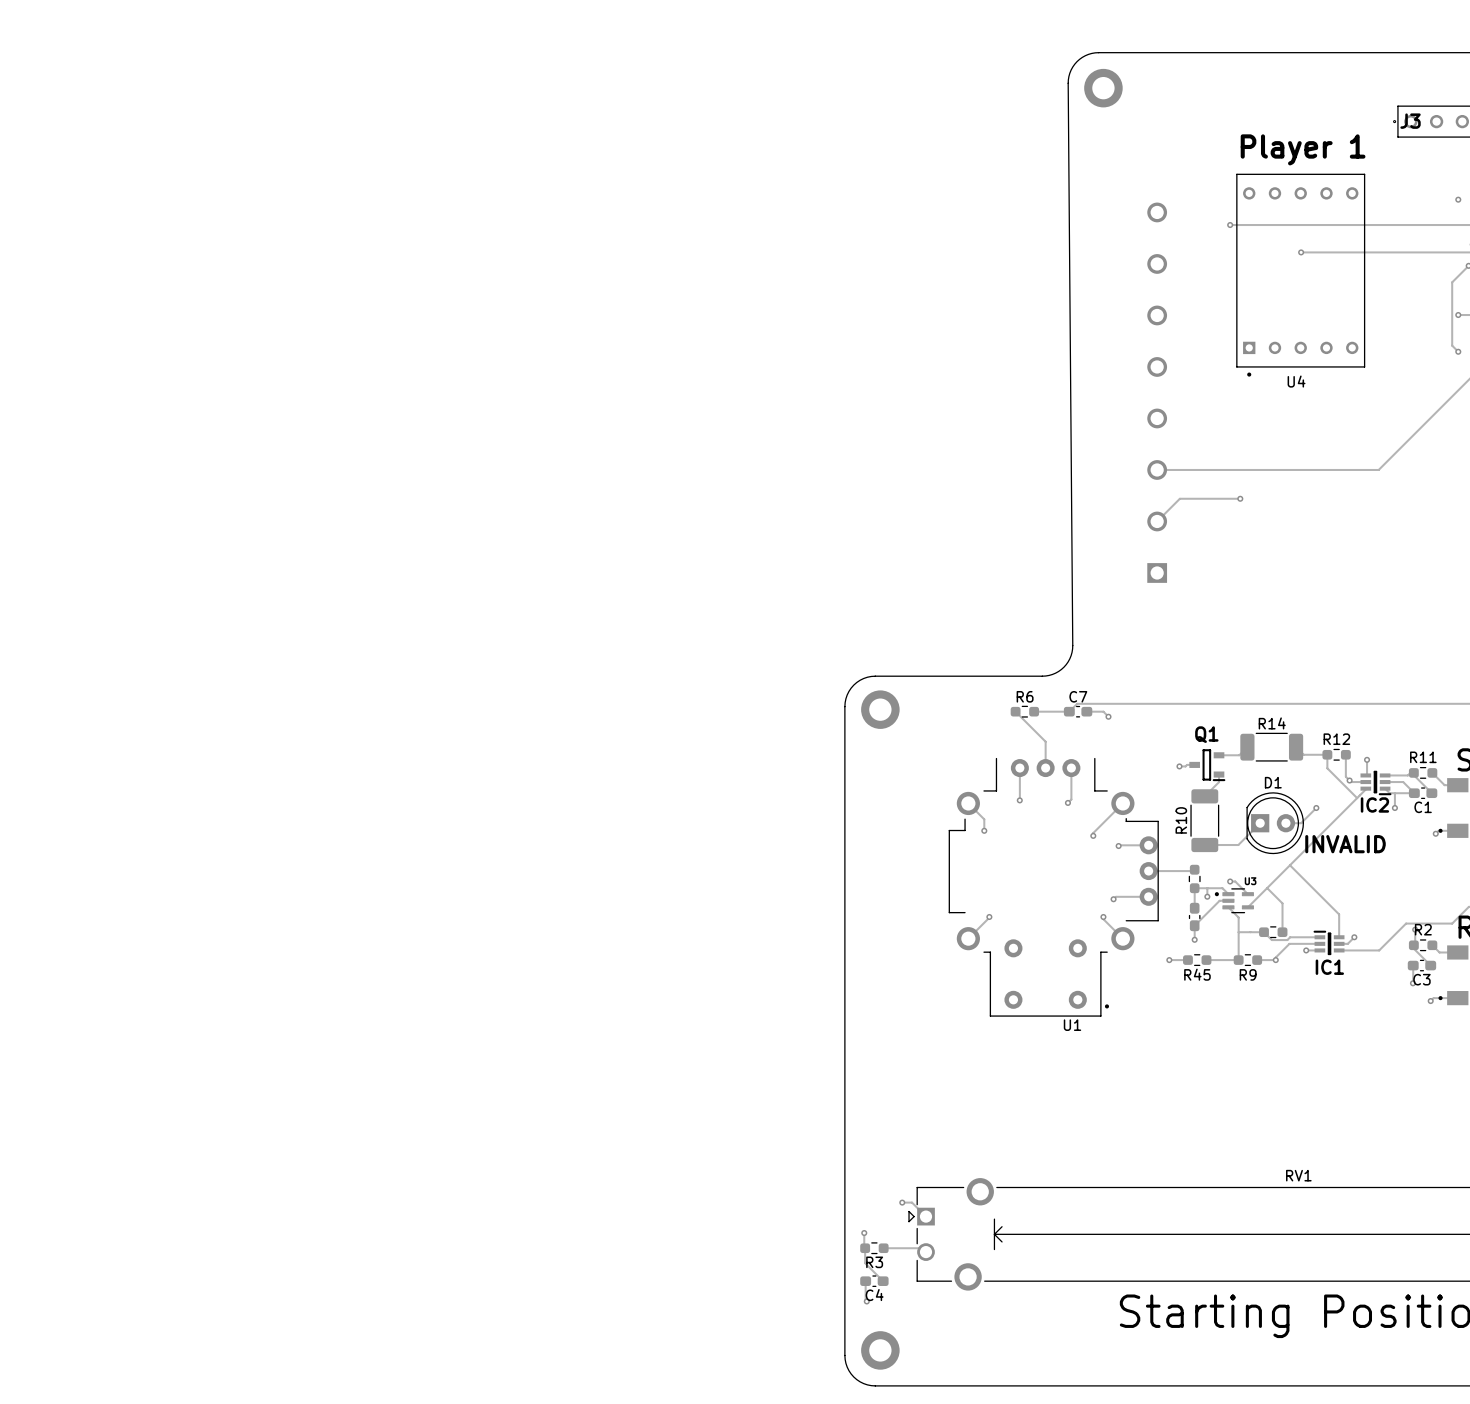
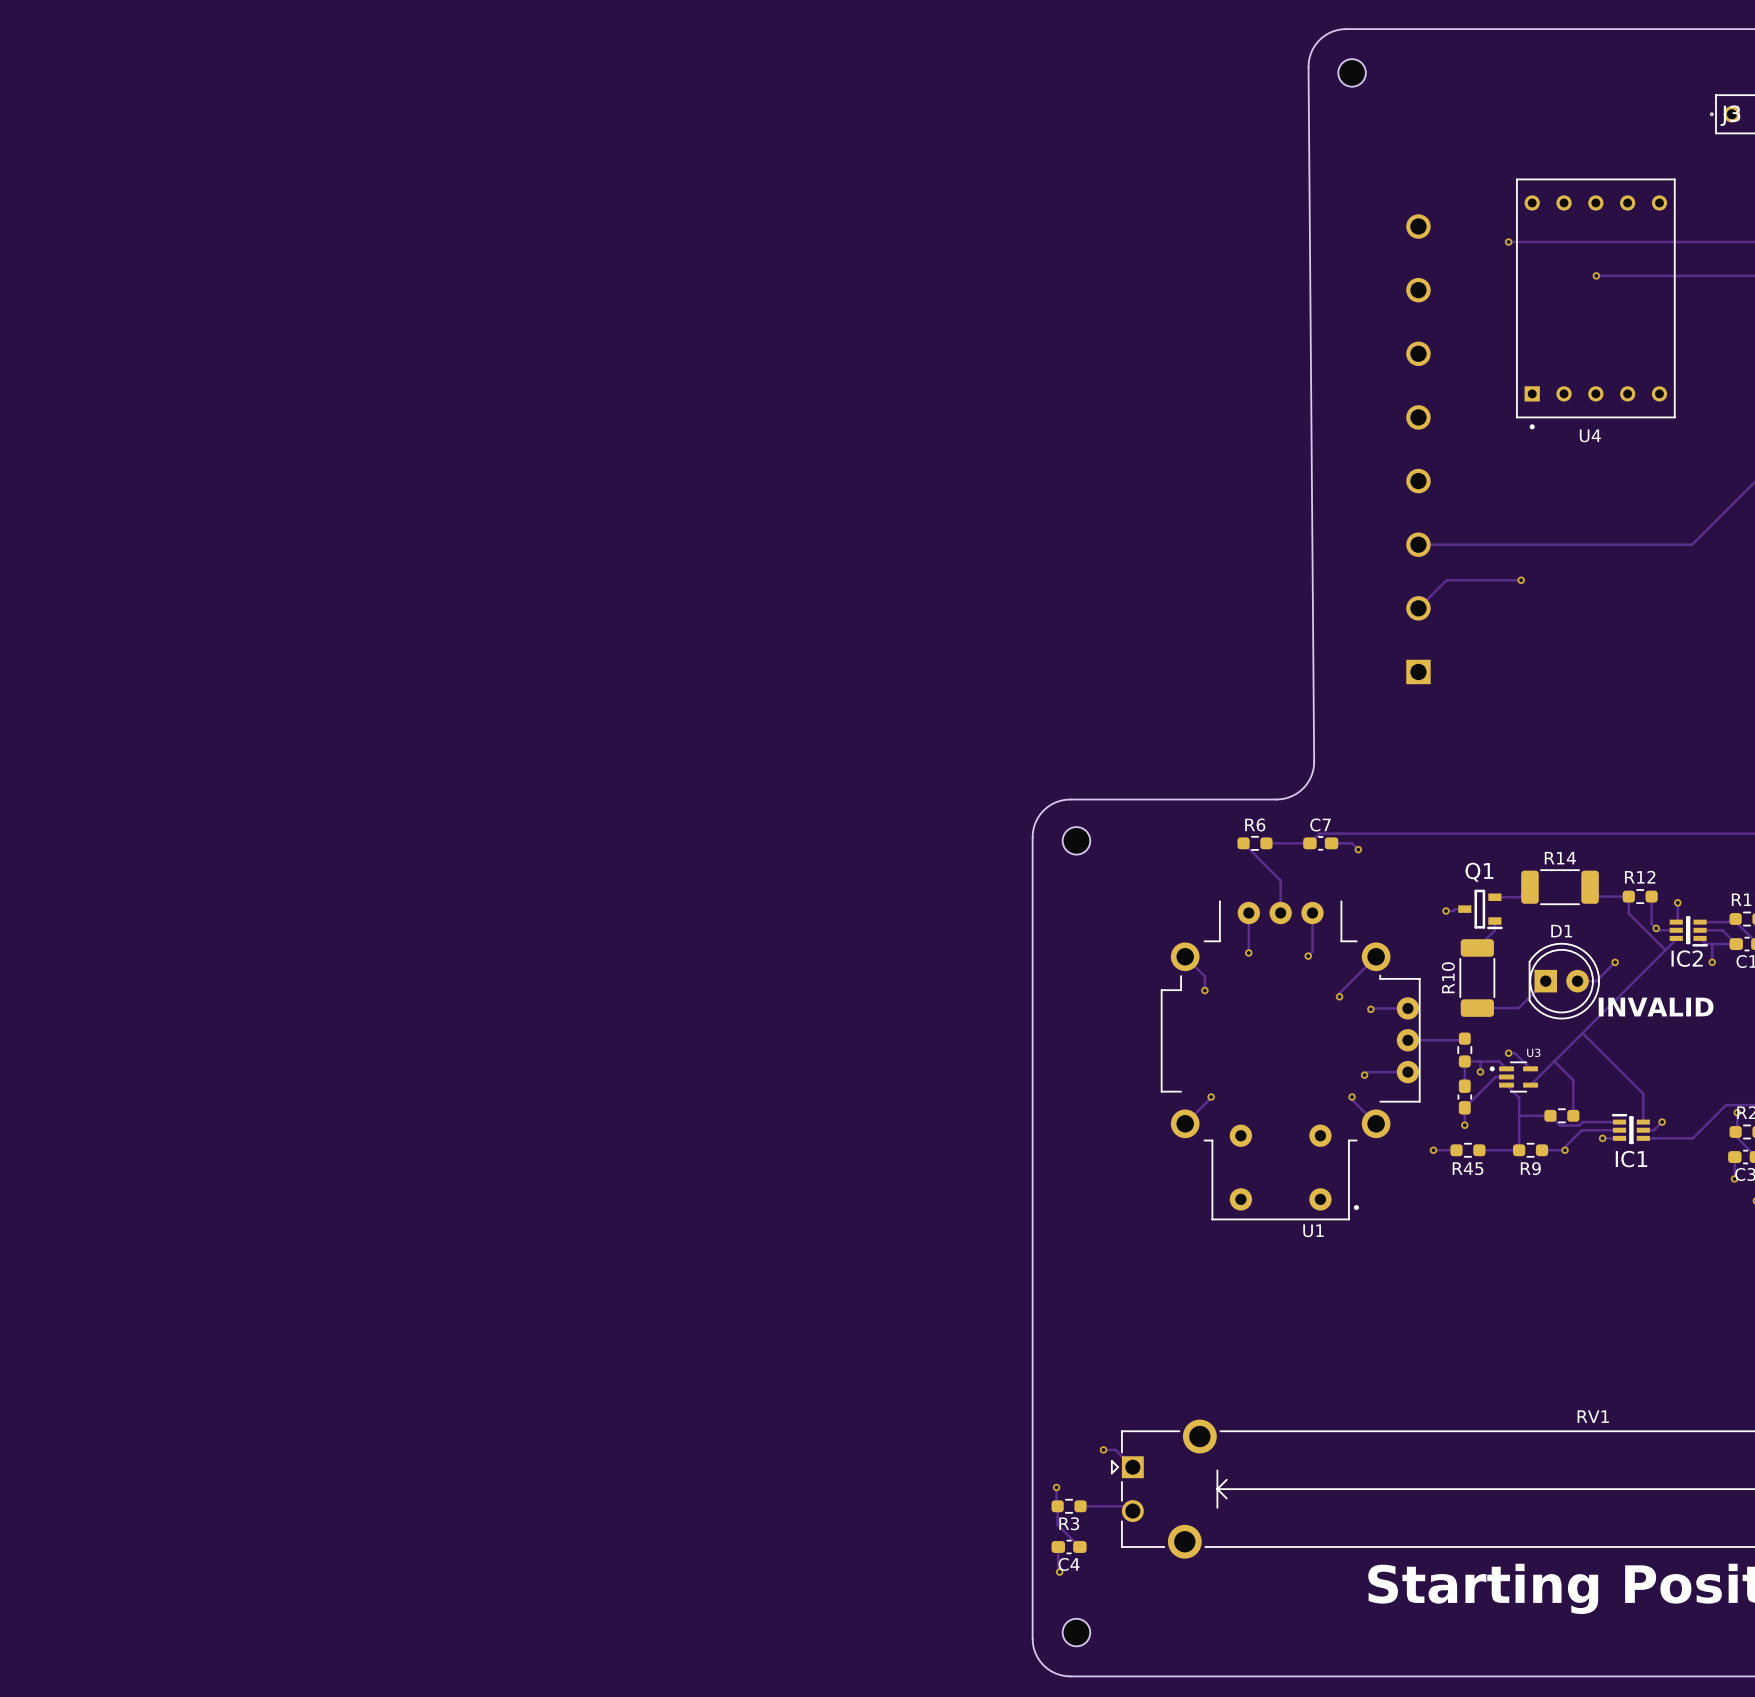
part footprint: [1084, 68, 1123, 108] -> [1338, 59, 1366, 87]
text: Player 1 (1303, 149) -> none
part footprint: [861, 690, 900, 729] -> [1062, 827, 1091, 855]
part footprint: [861, 1331, 900, 1370] -> [1062, 1618, 1091, 1647]

